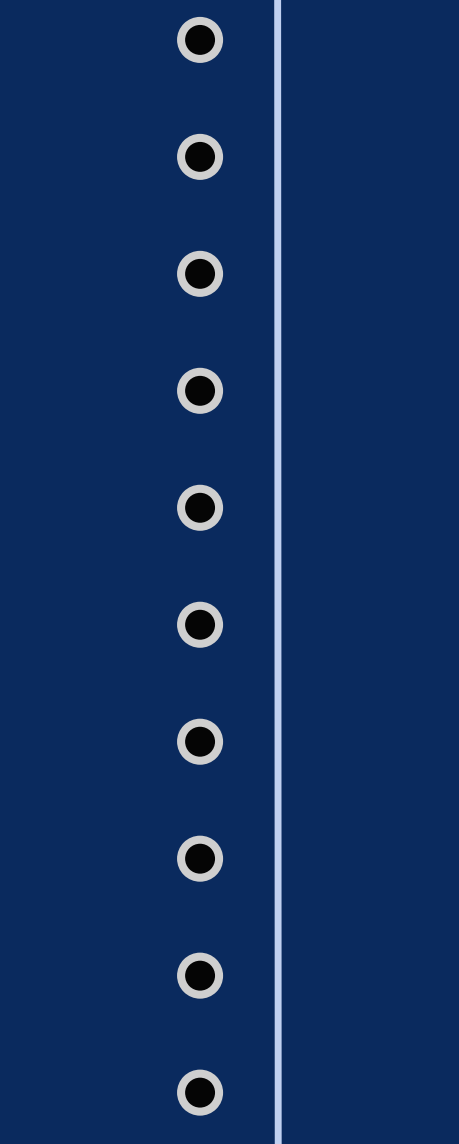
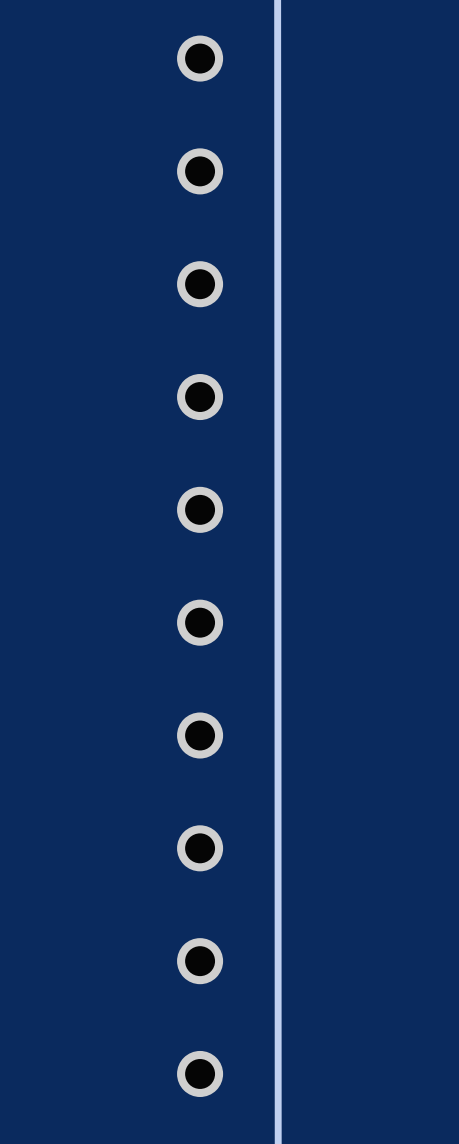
part footprint: [177, 16, 224, 1116] -> [177, 35, 224, 1098]

